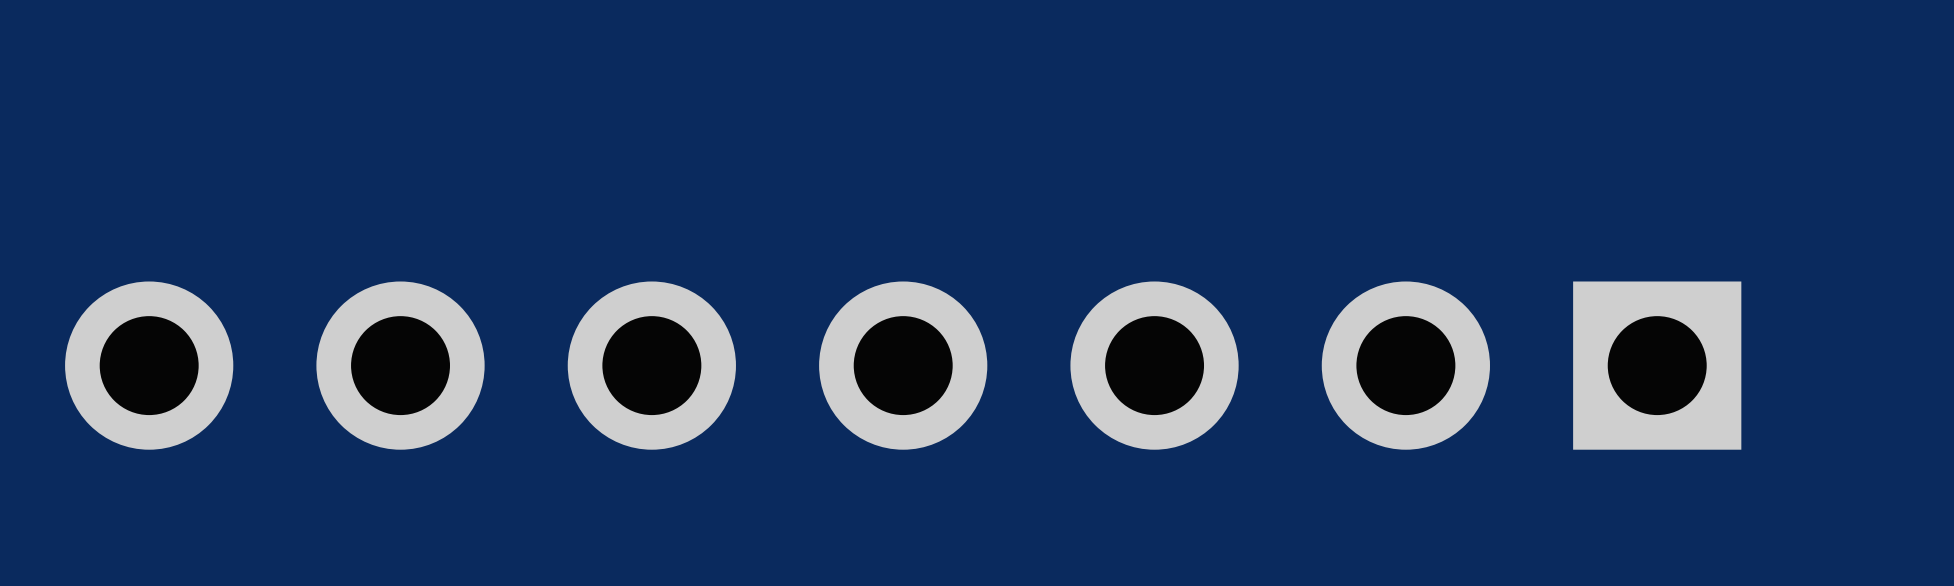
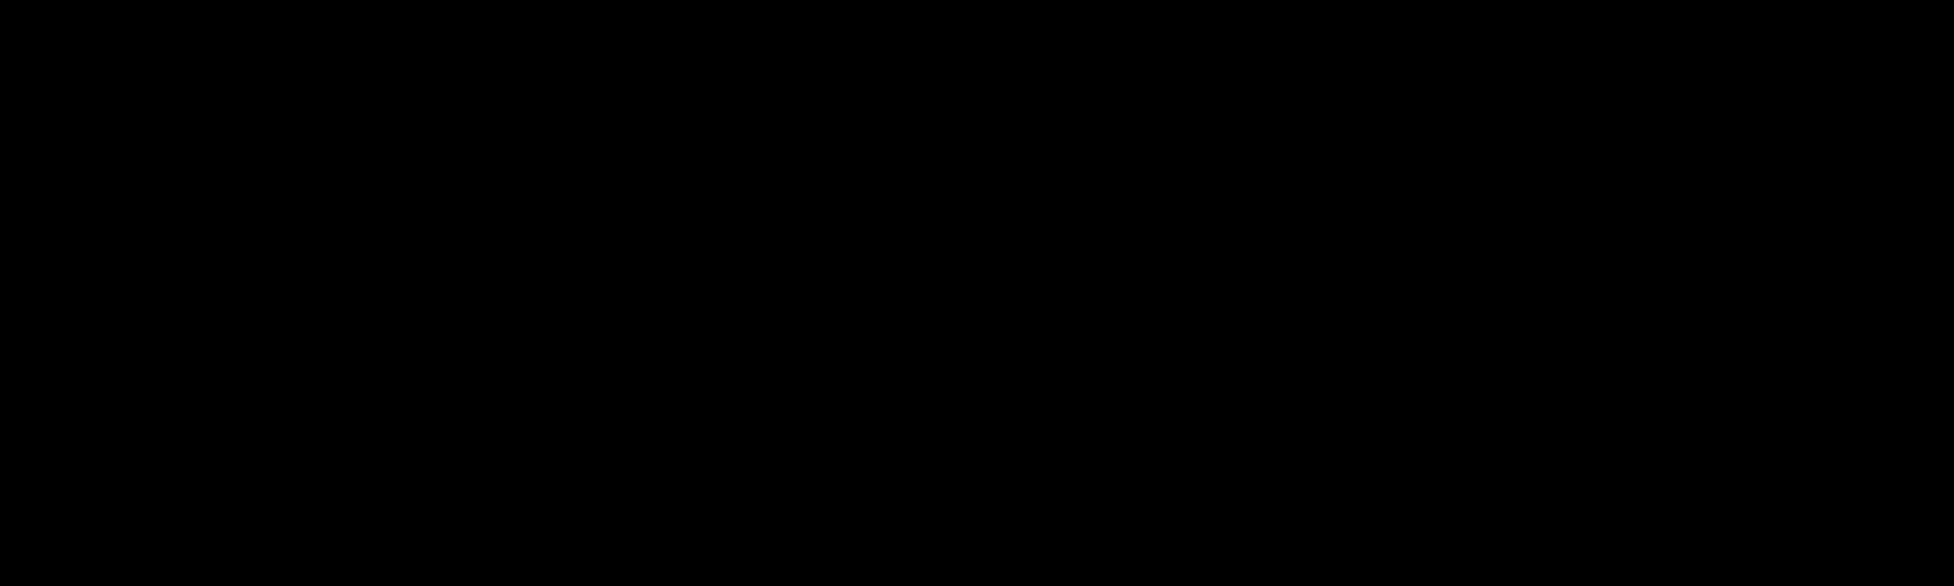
part: (903, 365) -> none

